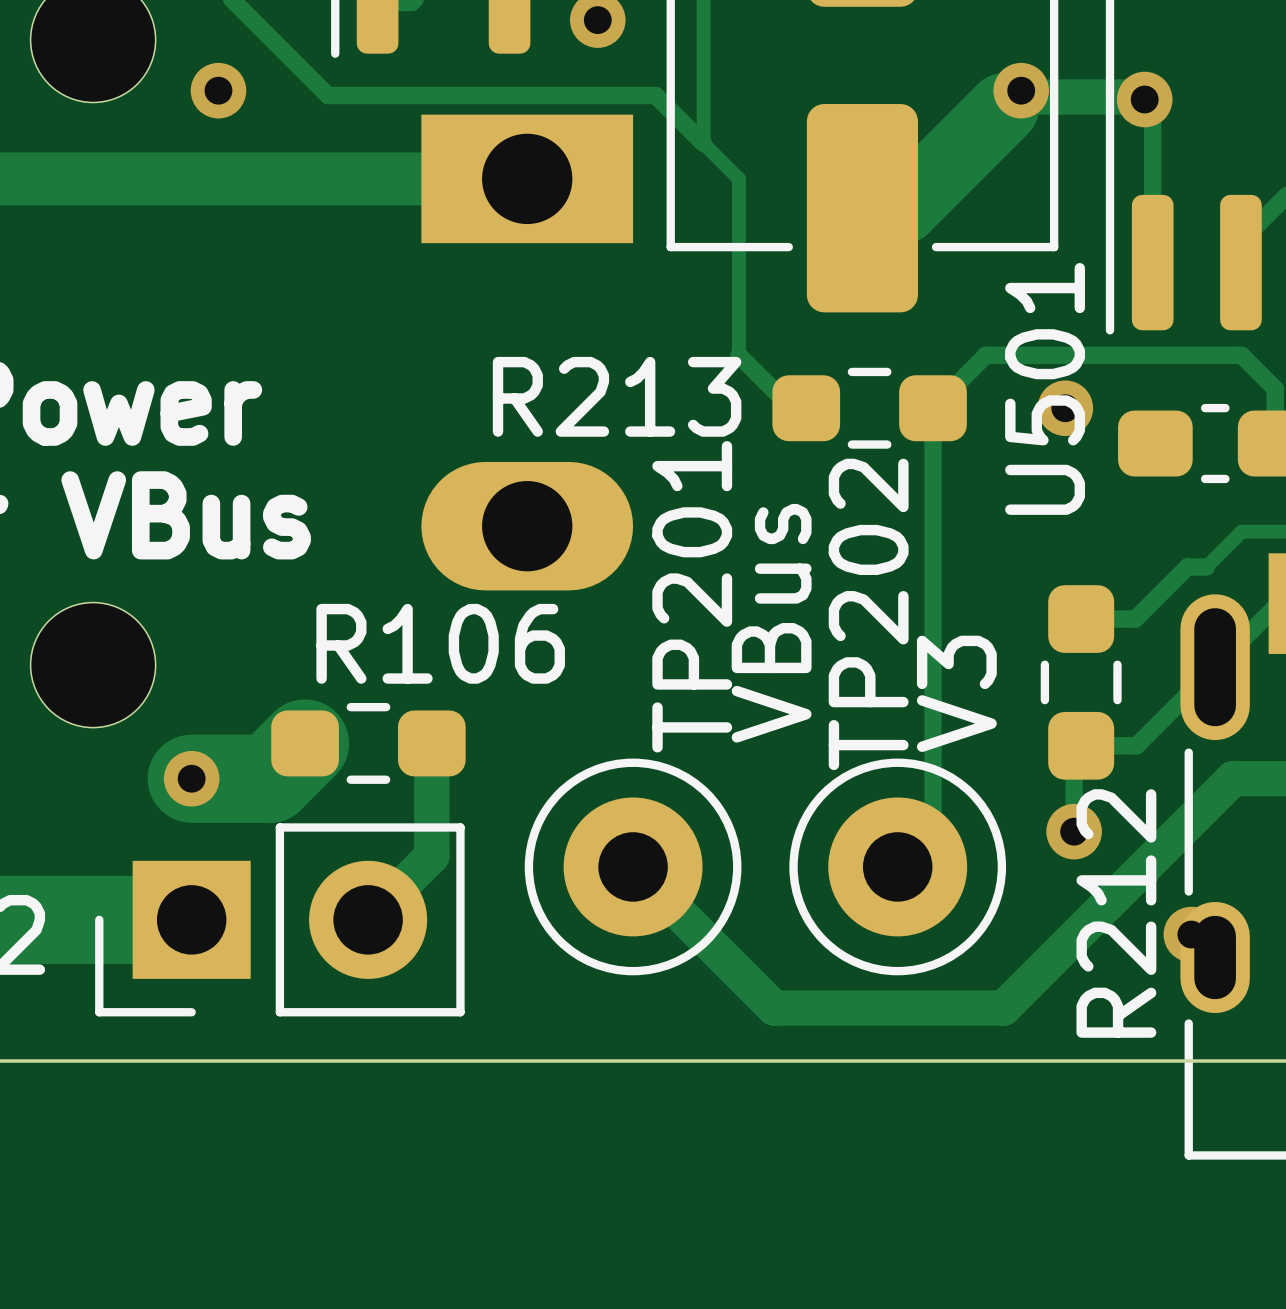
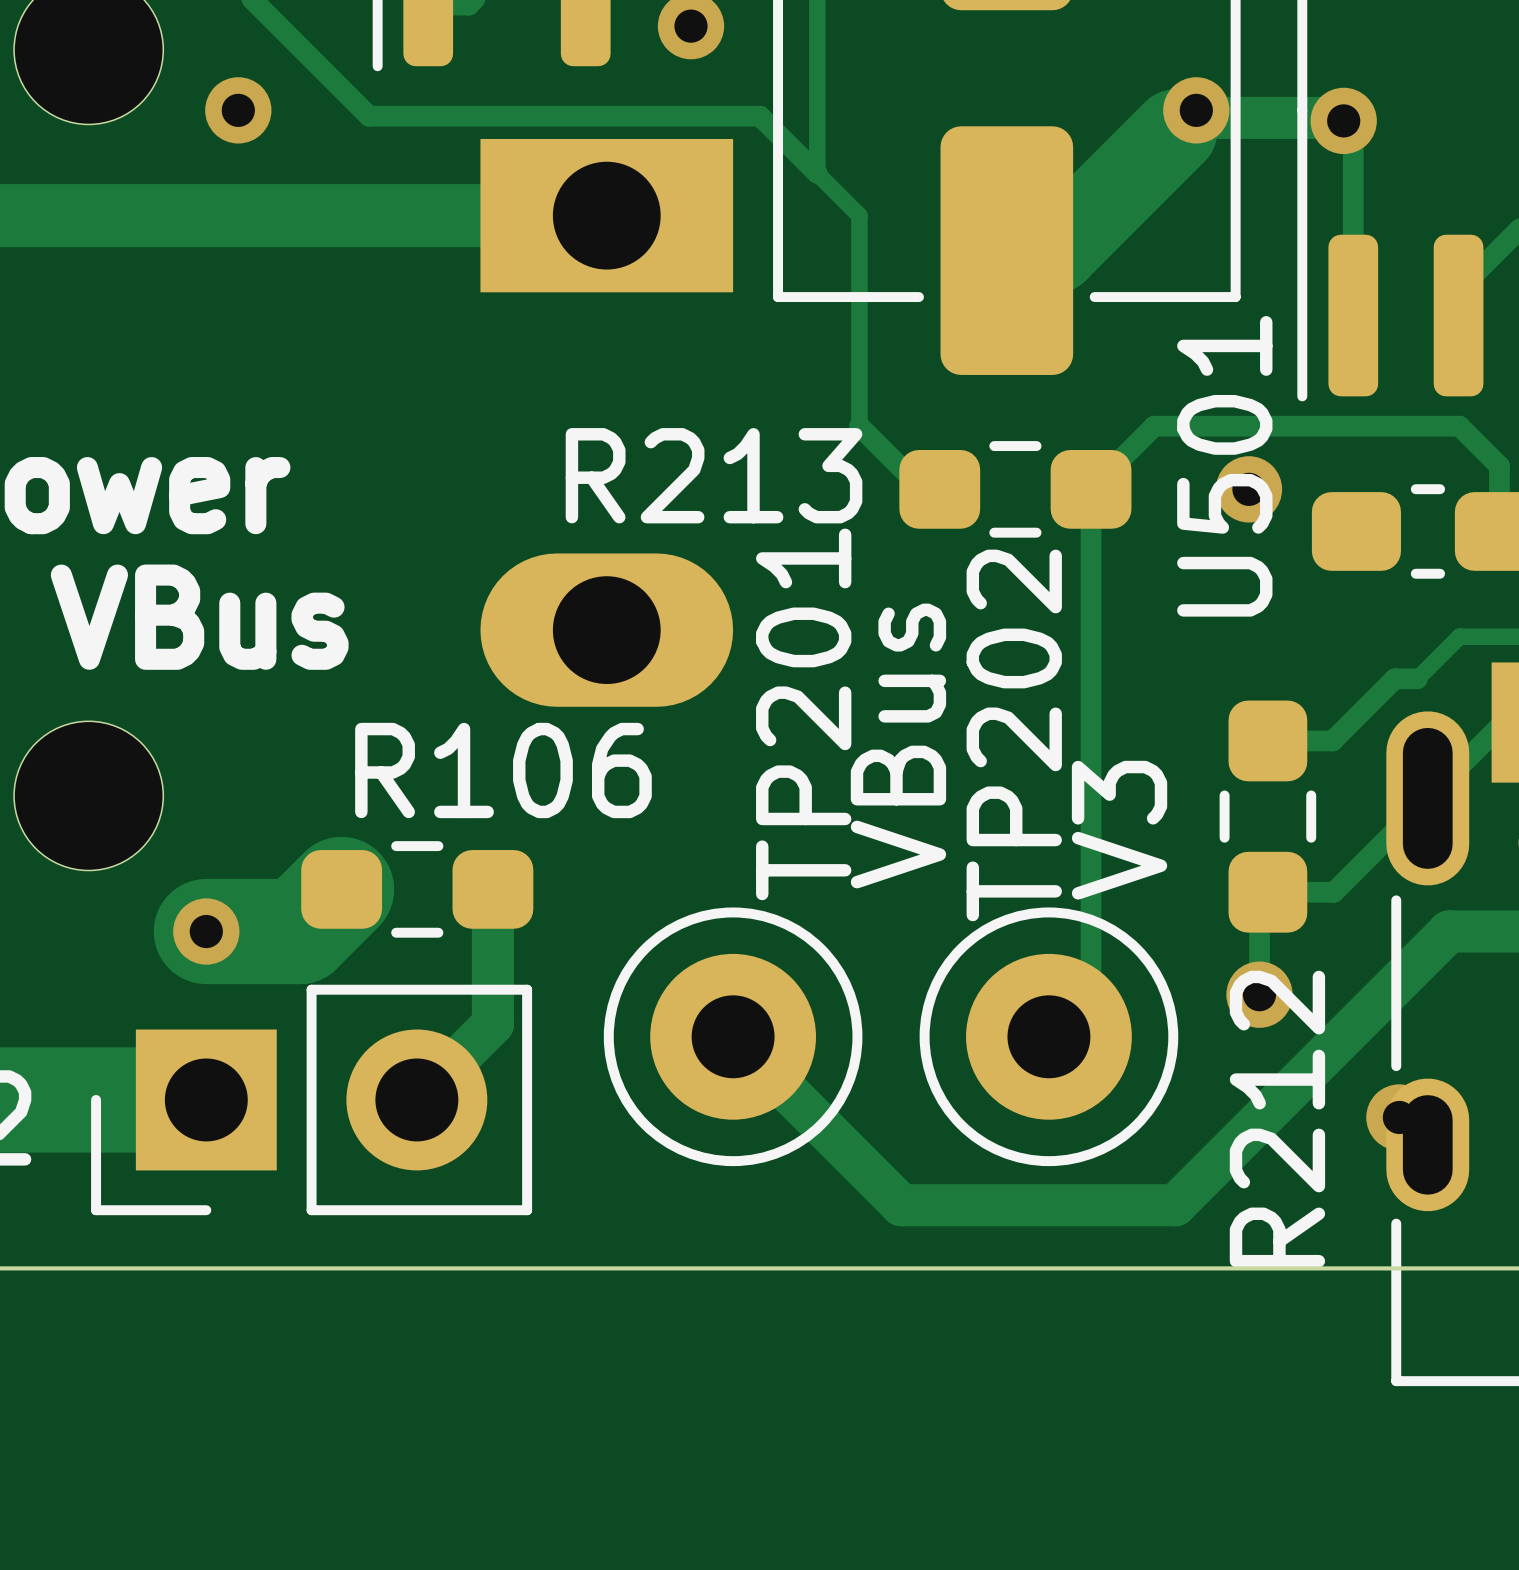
R212 name position: R212 (1116, 913) -> R212 (1277, 1119)

